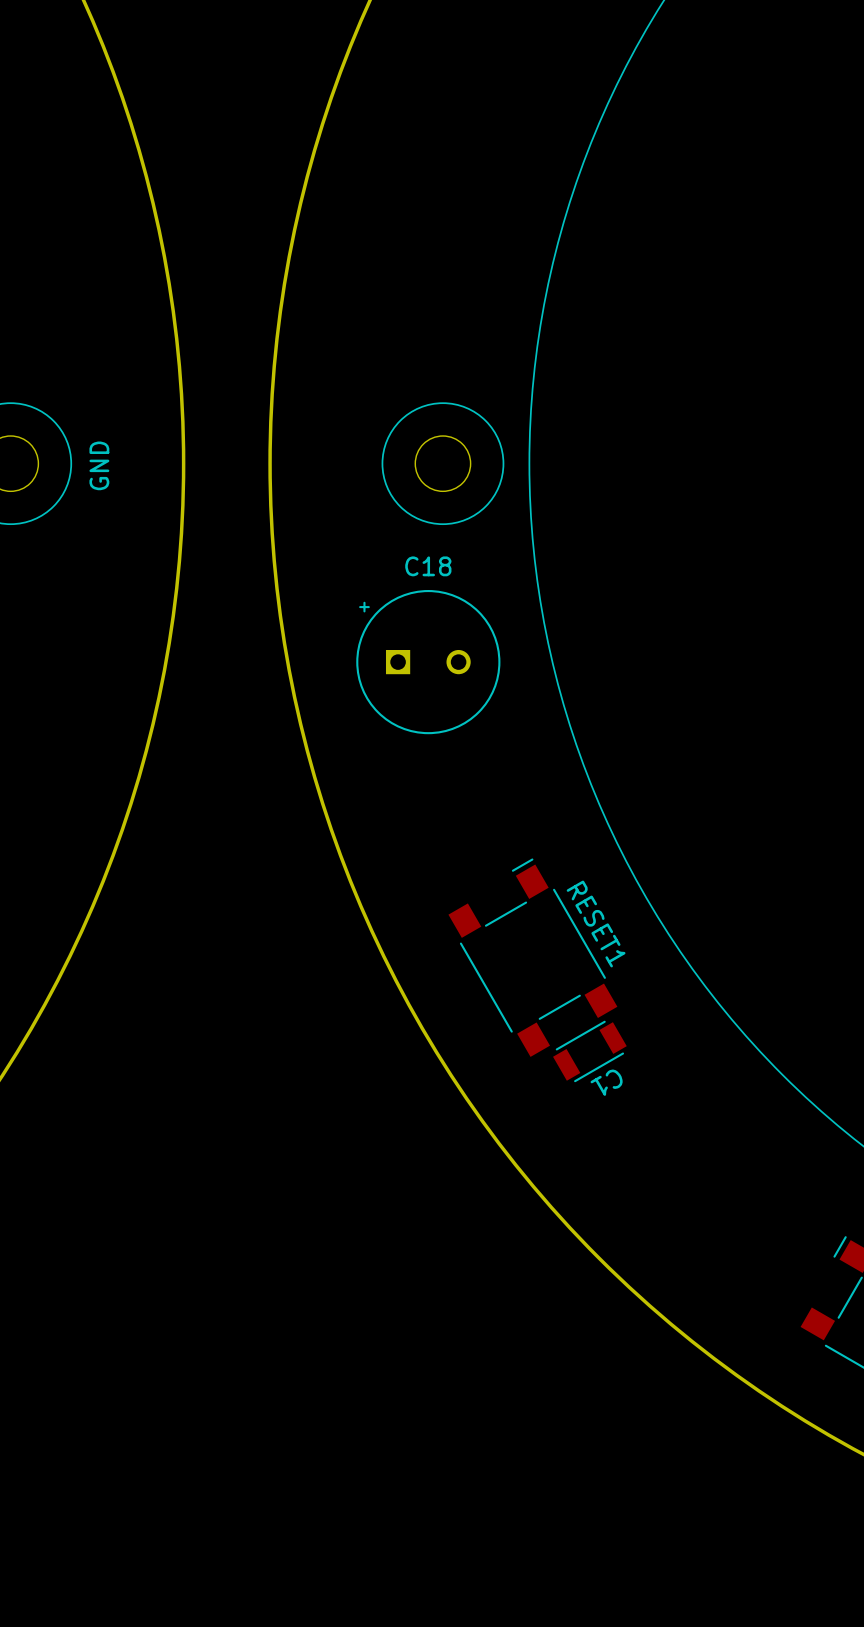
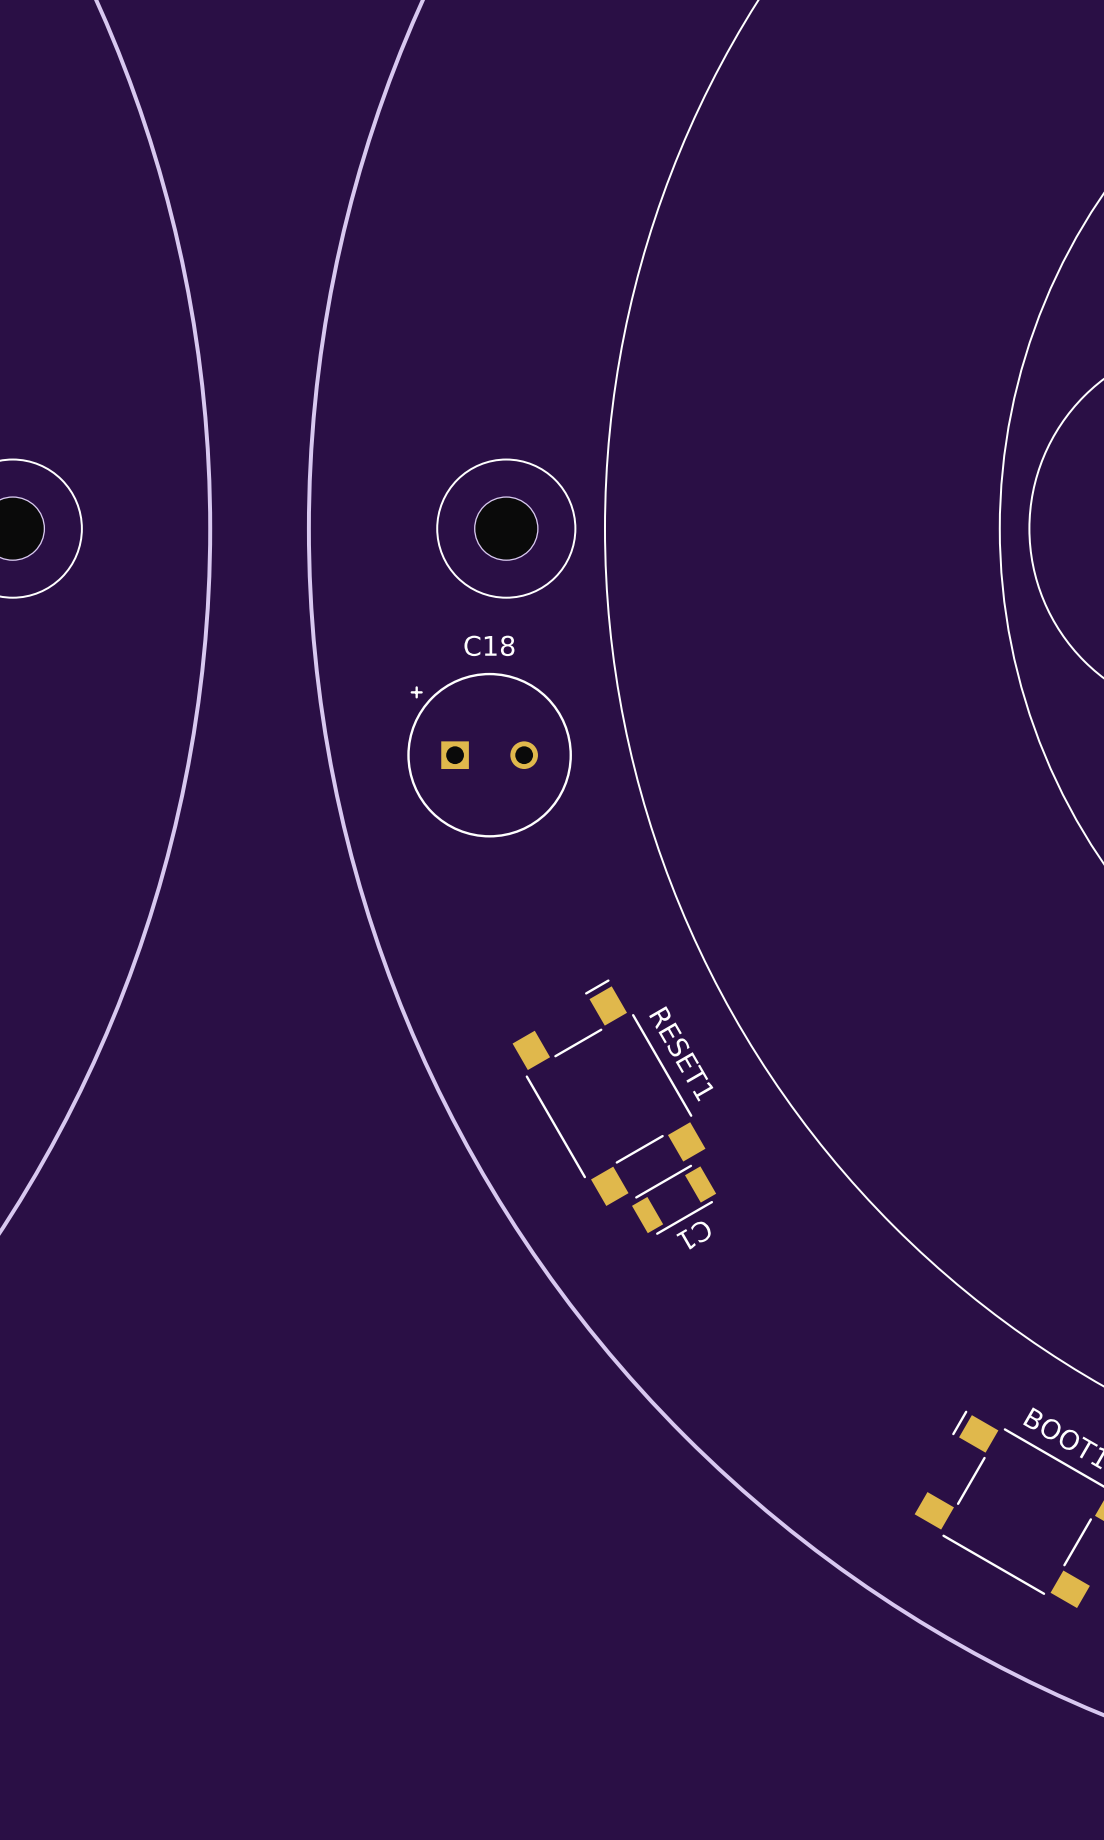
text: GND (99, 465) -> none

